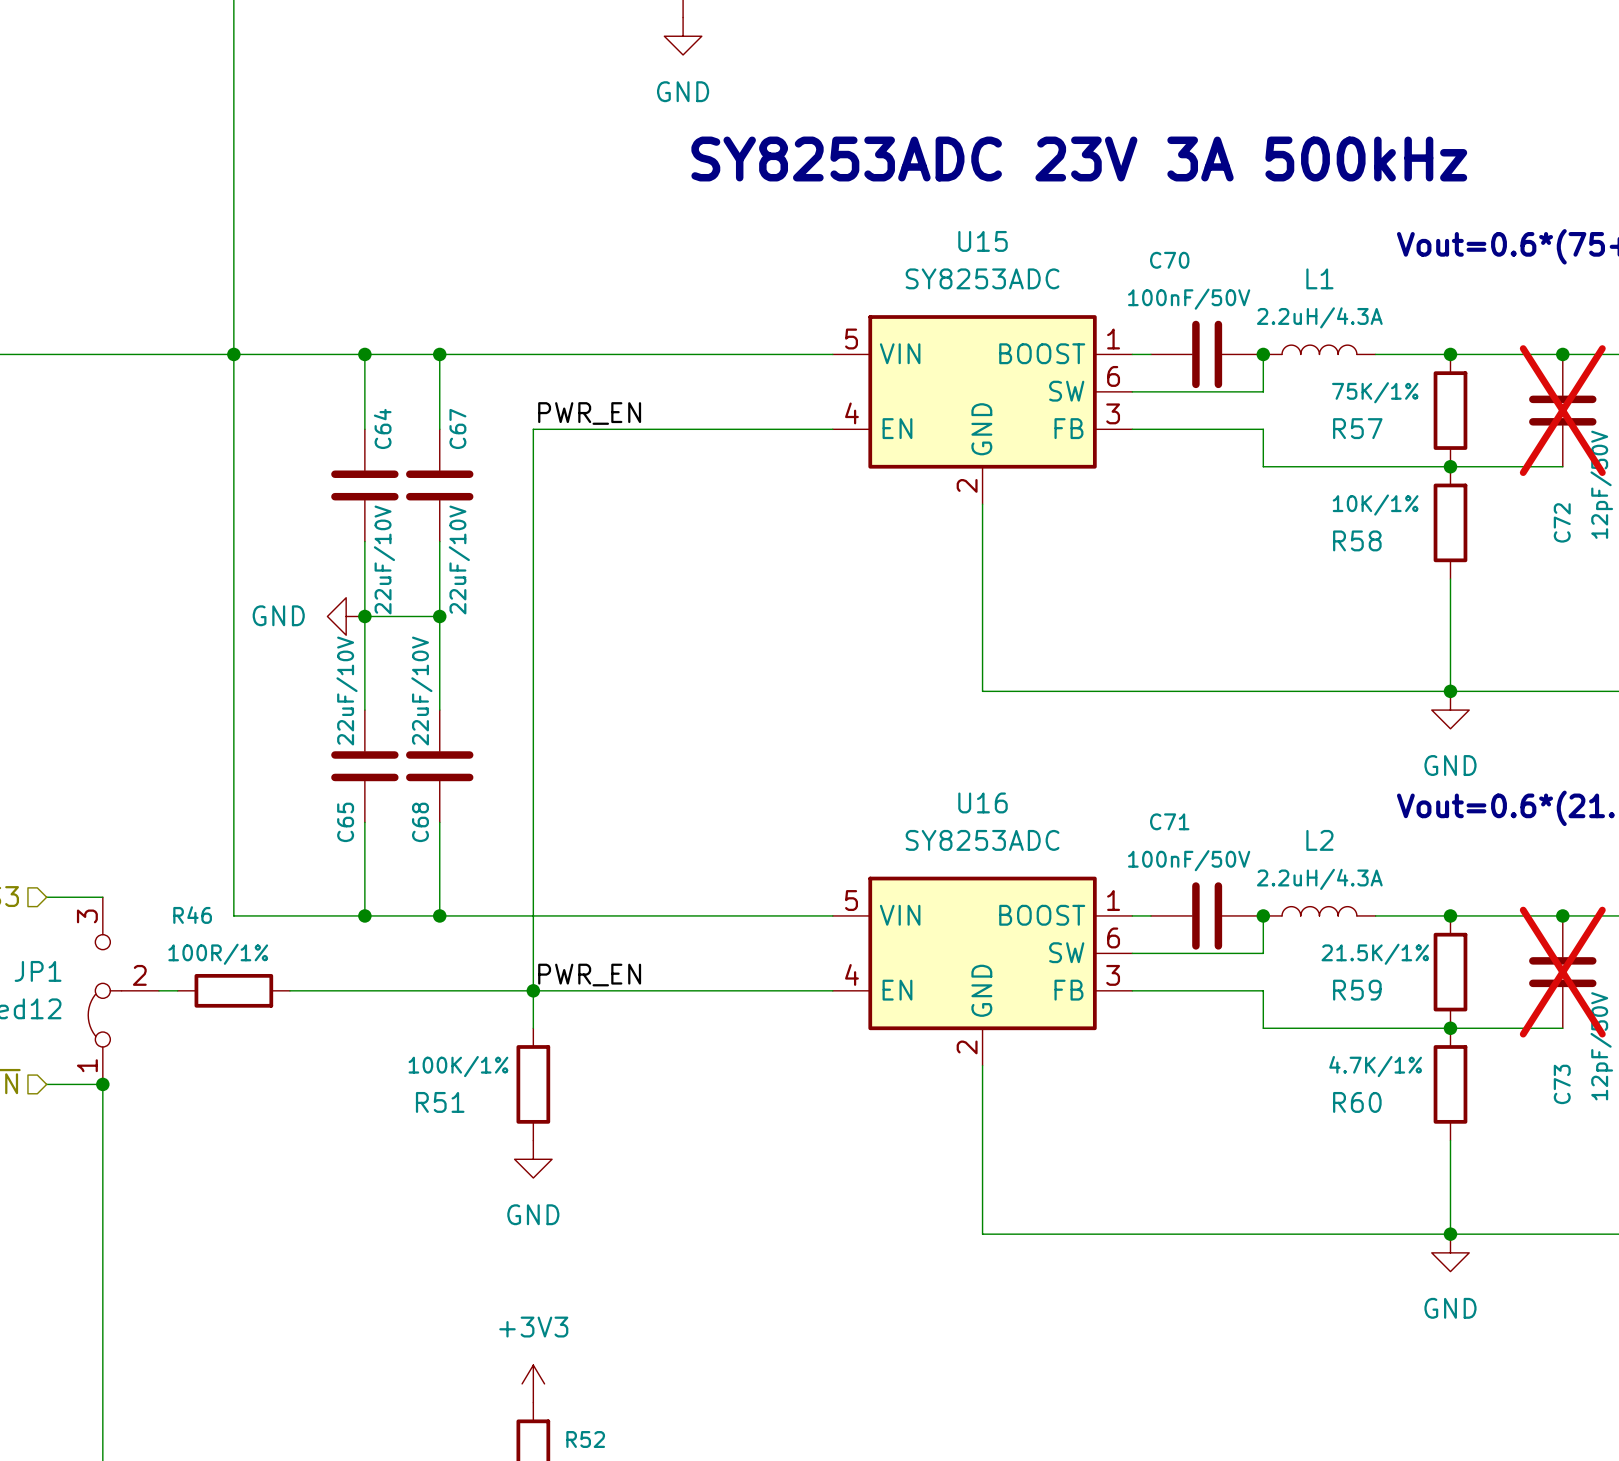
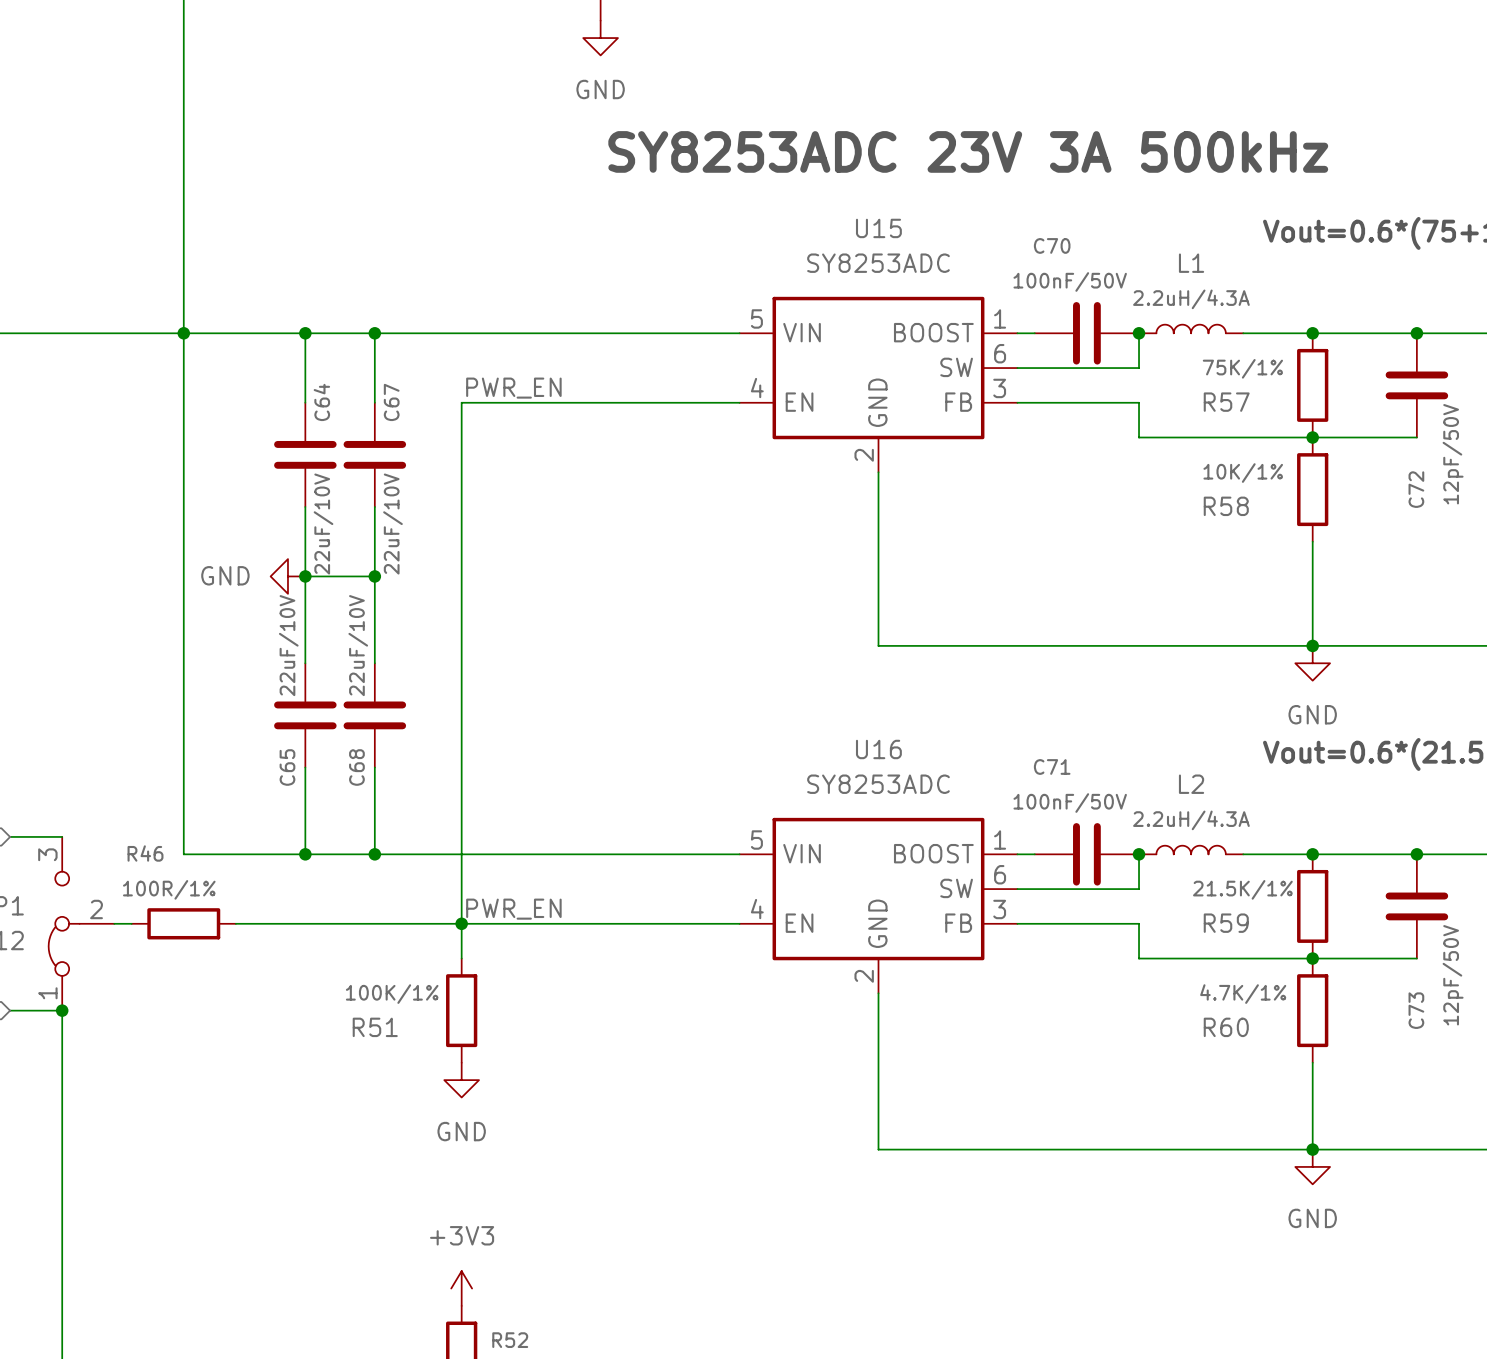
C72 do-not-place cross: (1562, 410) -> none
C73 do-not-place cross: (1562, 972) -> none

